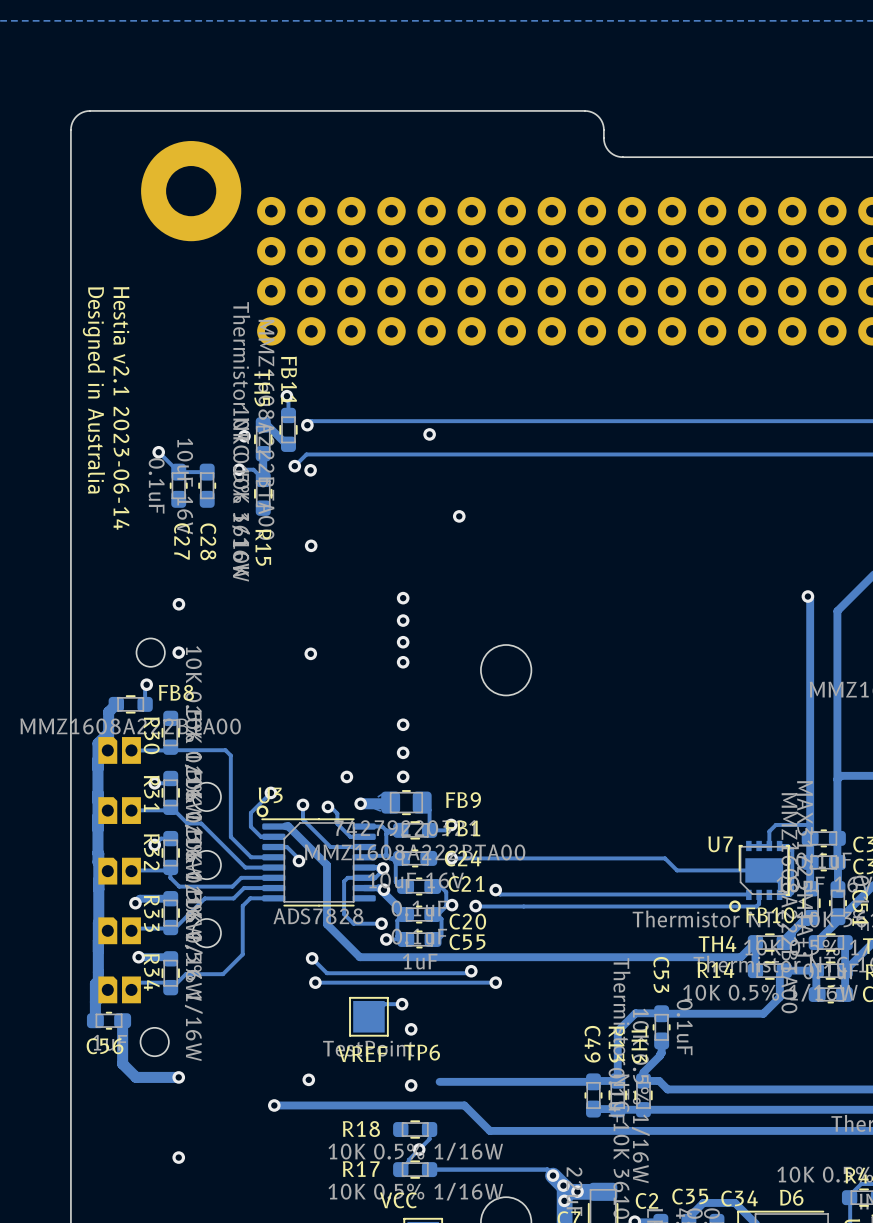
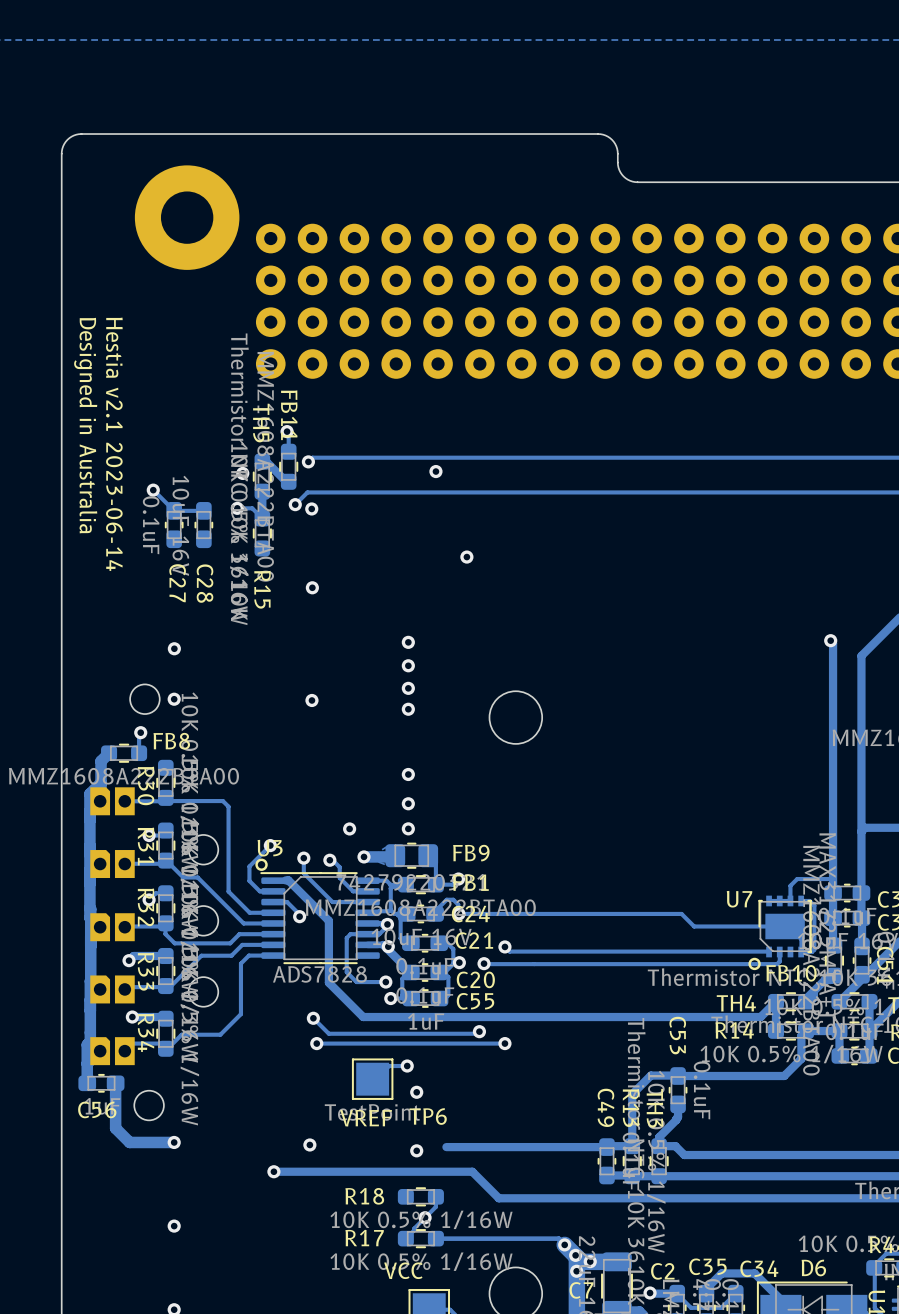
track: none -> (435, 913) (435, 911) (446, 899) (453, 899) (458, 904) (458, 914)

